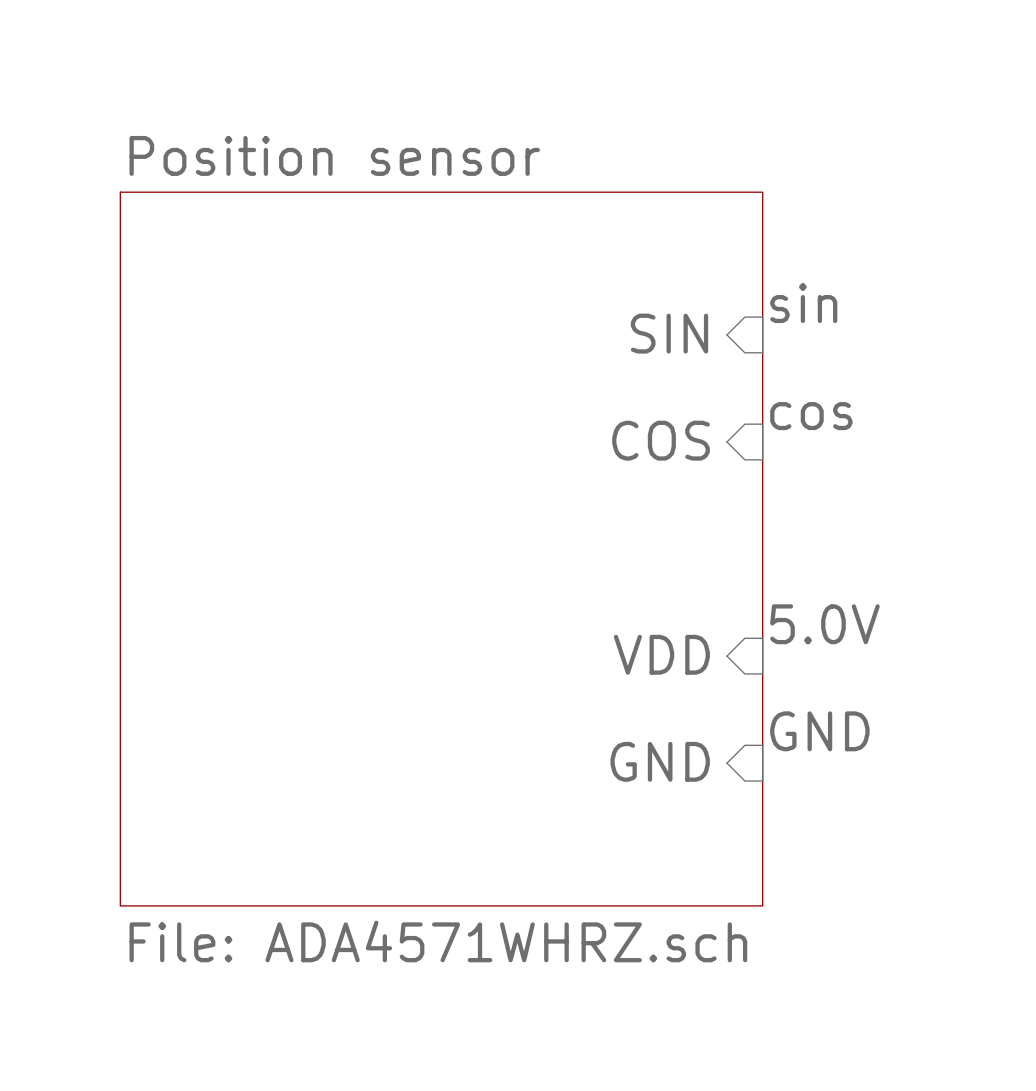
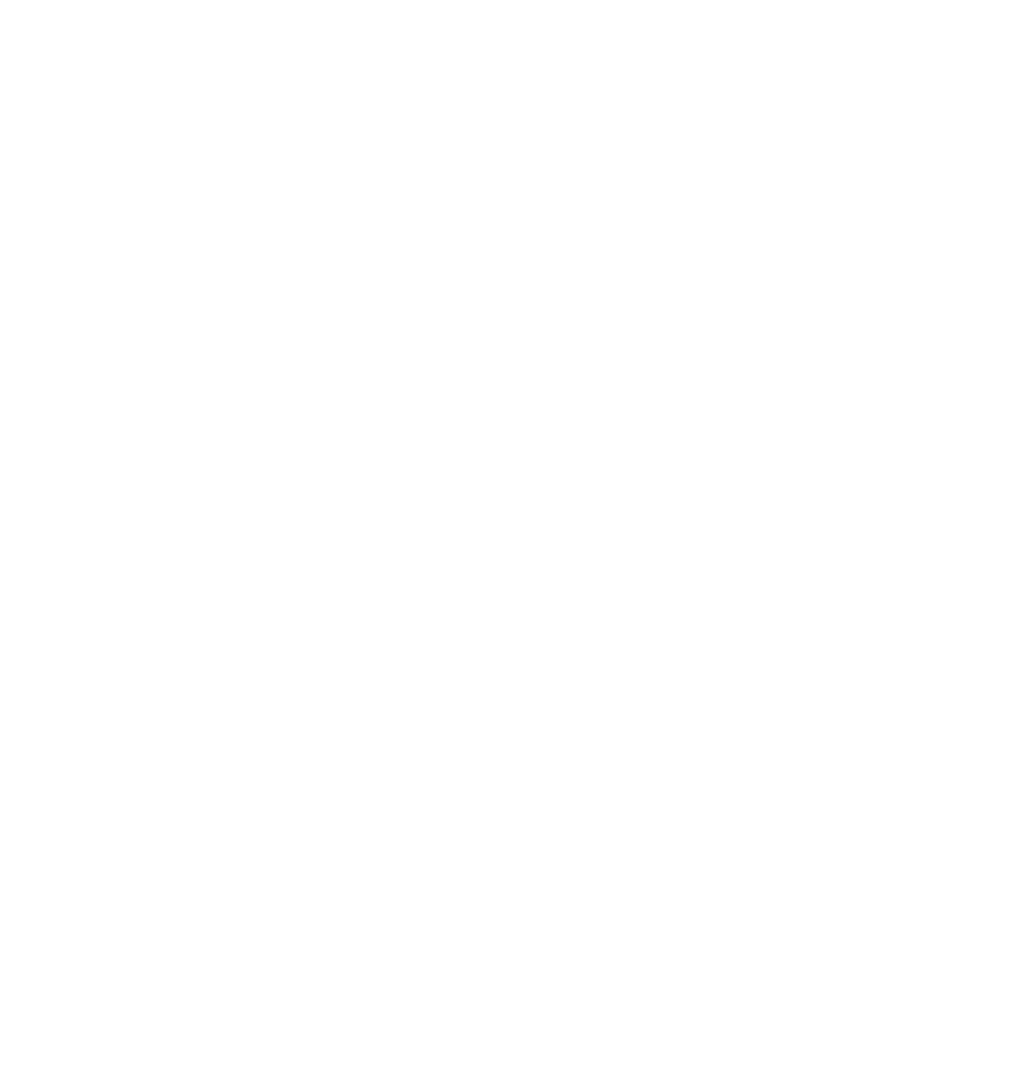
label: sin (803, 303) -> none
sheet pin: SIN (669, 333) -> none
label: cos (811, 416) -> none
sheet pin: COS (661, 440) -> none
sheet Position sensor: File: ADA4571WHRZ.sch (441, 549) -> none
label: 5.0V (824, 624) -> none
sheet pin: VDD (661, 654) -> none
label: GND (819, 731) -> none
sheet pin: GND (660, 761) -> none

